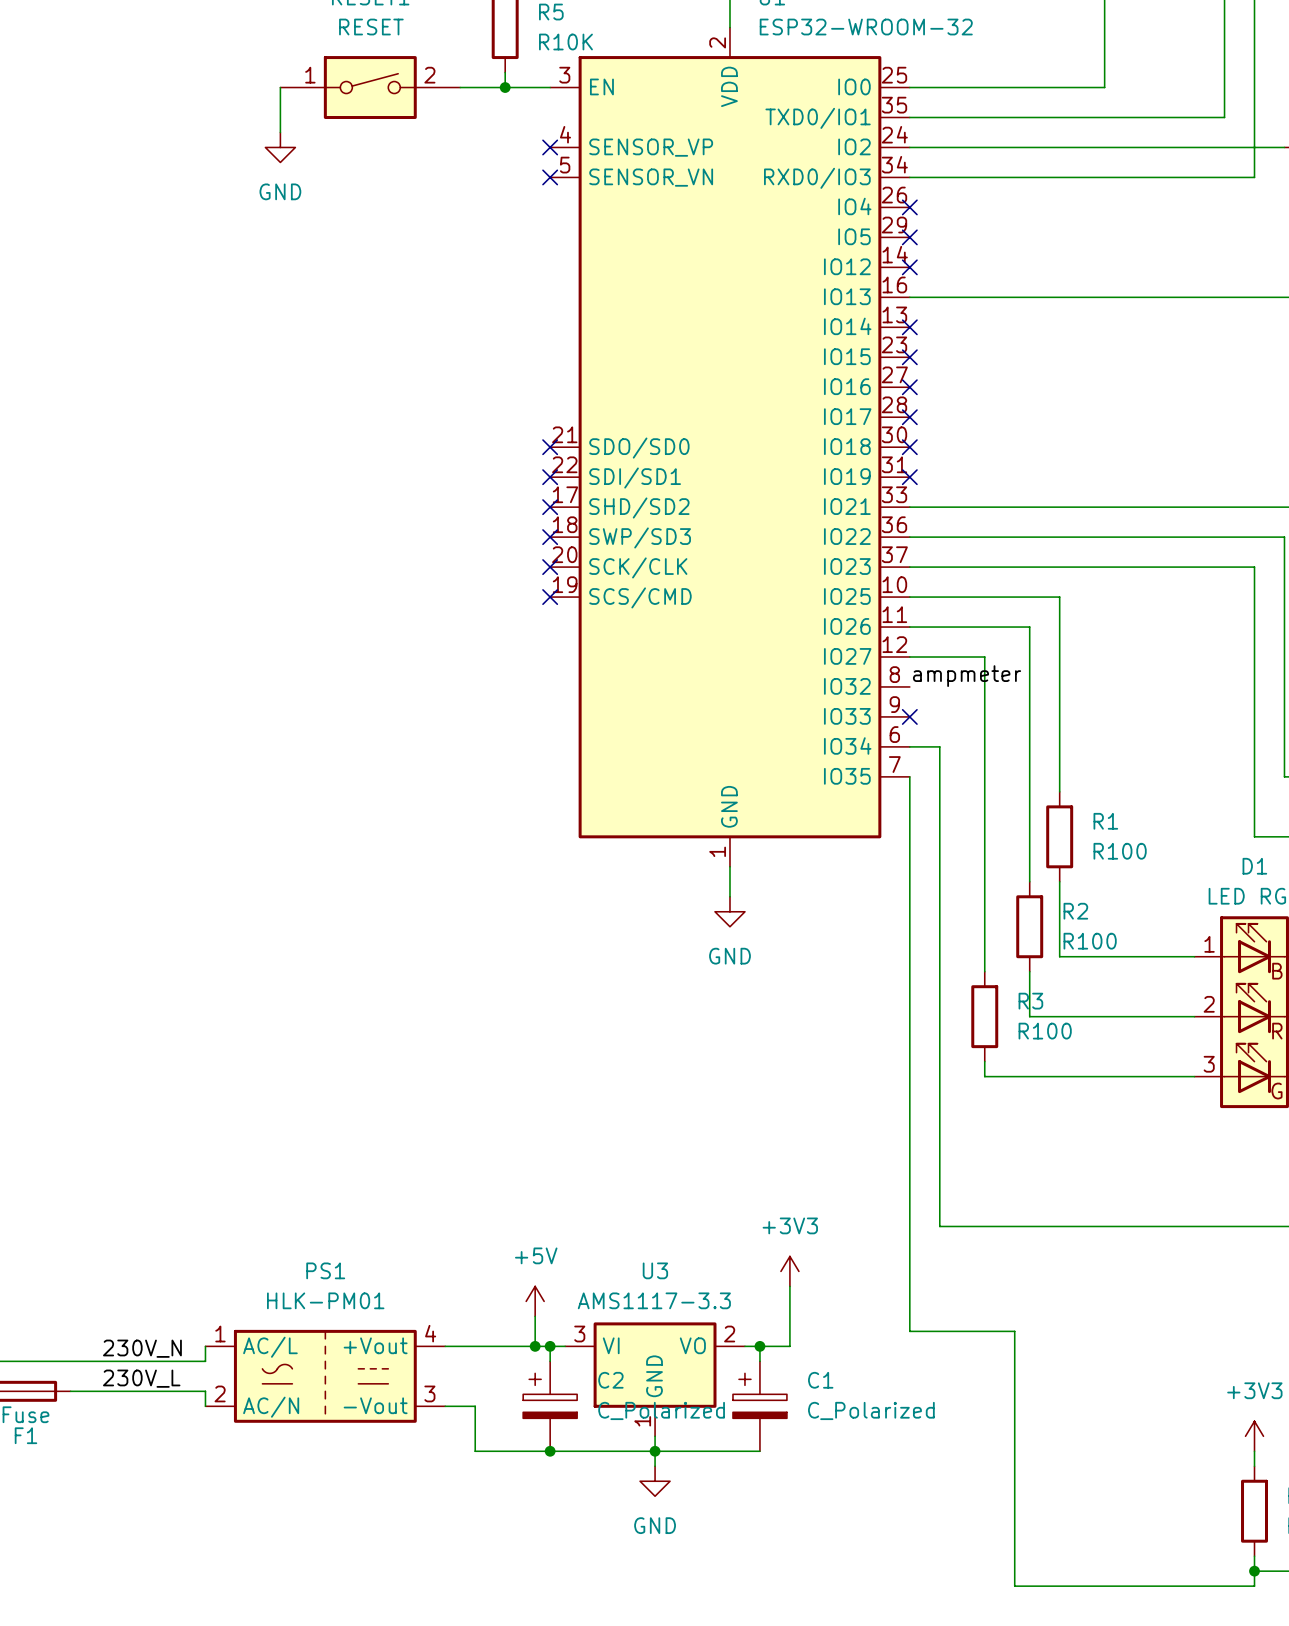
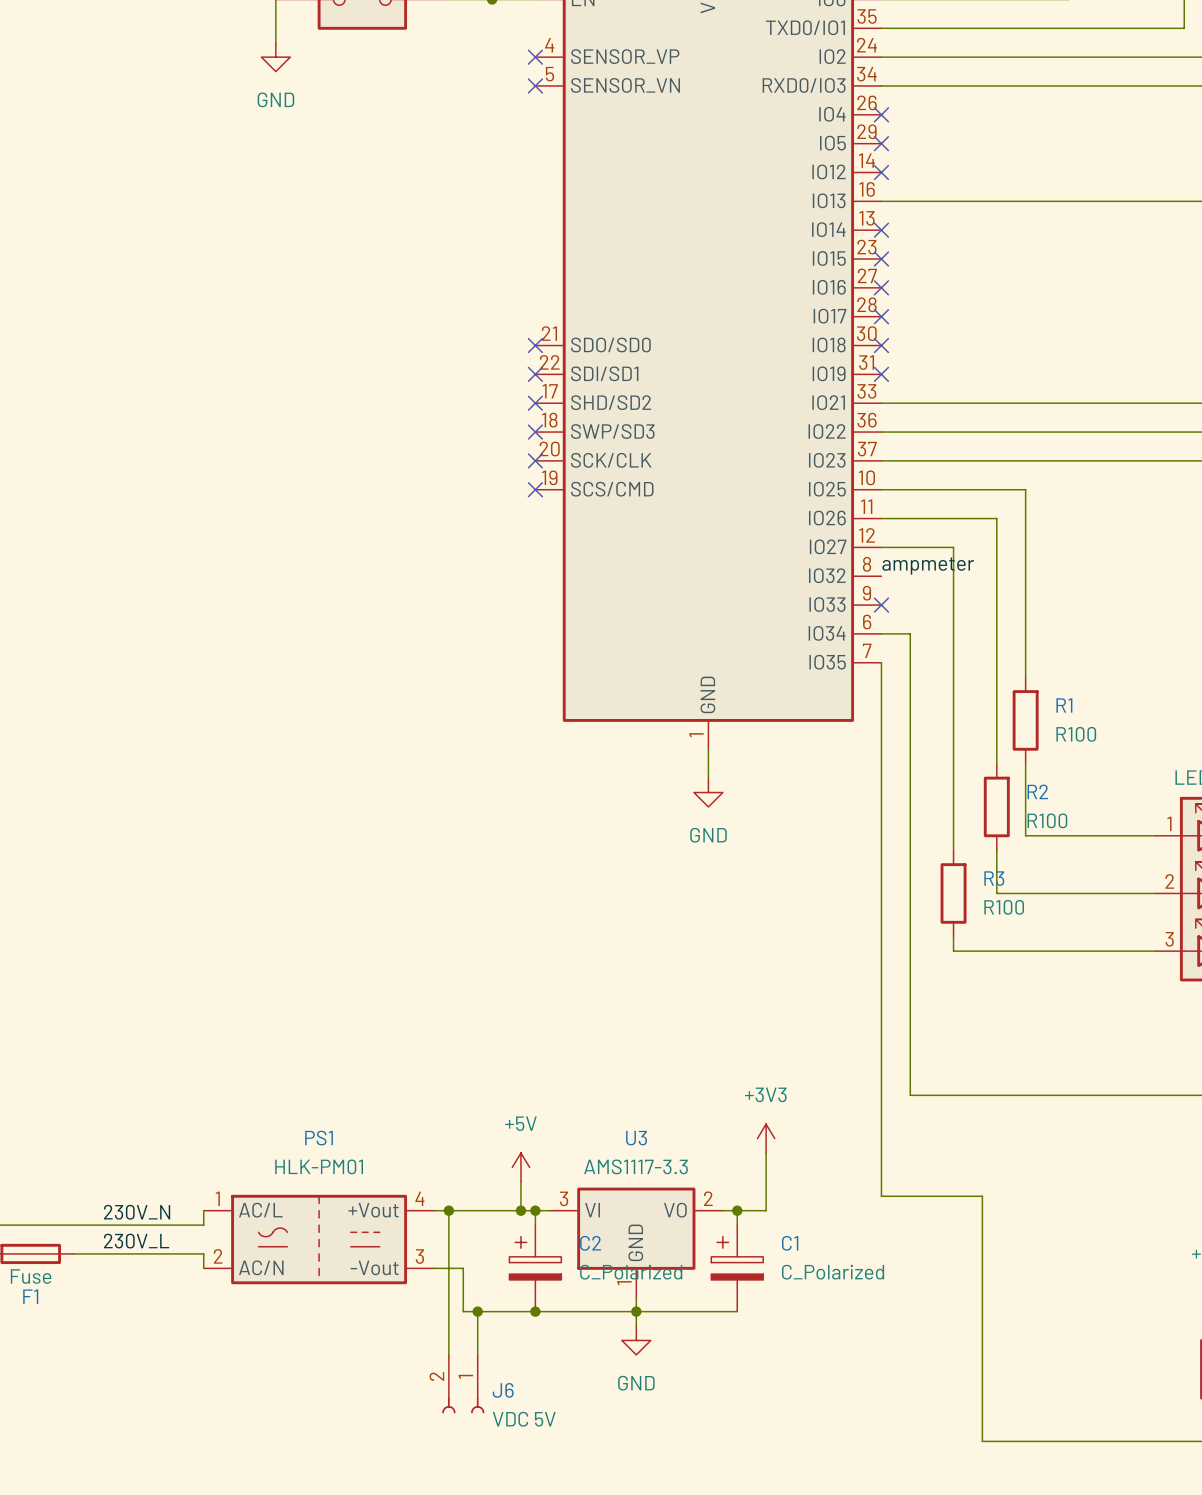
wire: none -> (448, 1210) (448, 1354)
junction: none -> (448, 1210)
wire: none -> (477, 1311) (477, 1354)
junction: none -> (477, 1311)
J6: none -> VDC 5V (463, 1384)

